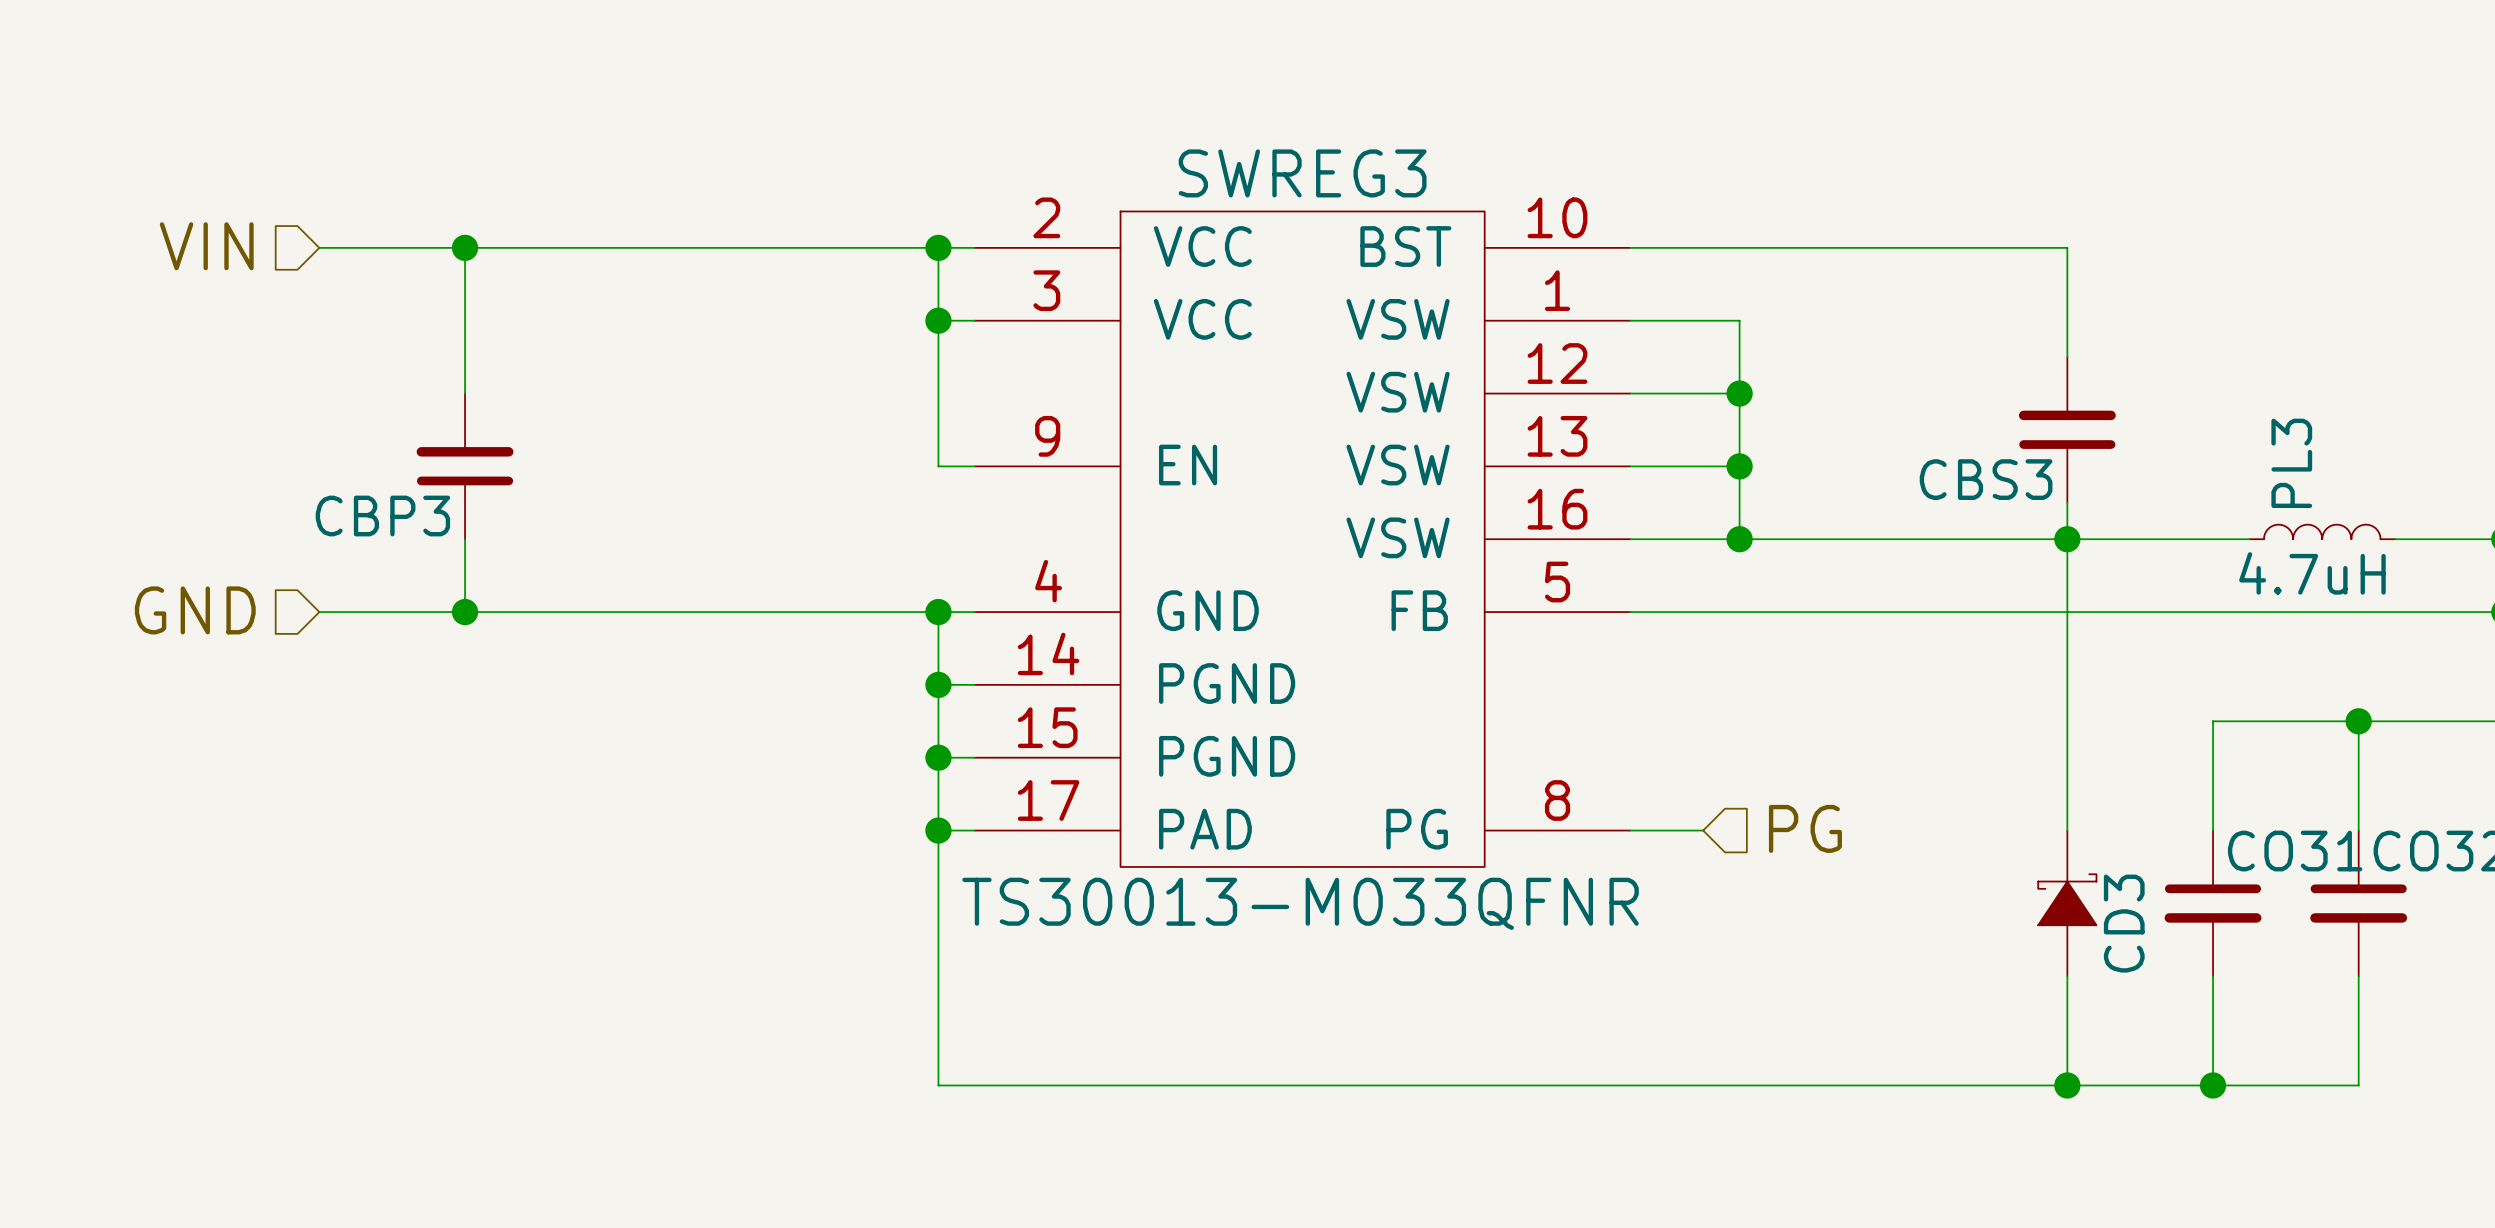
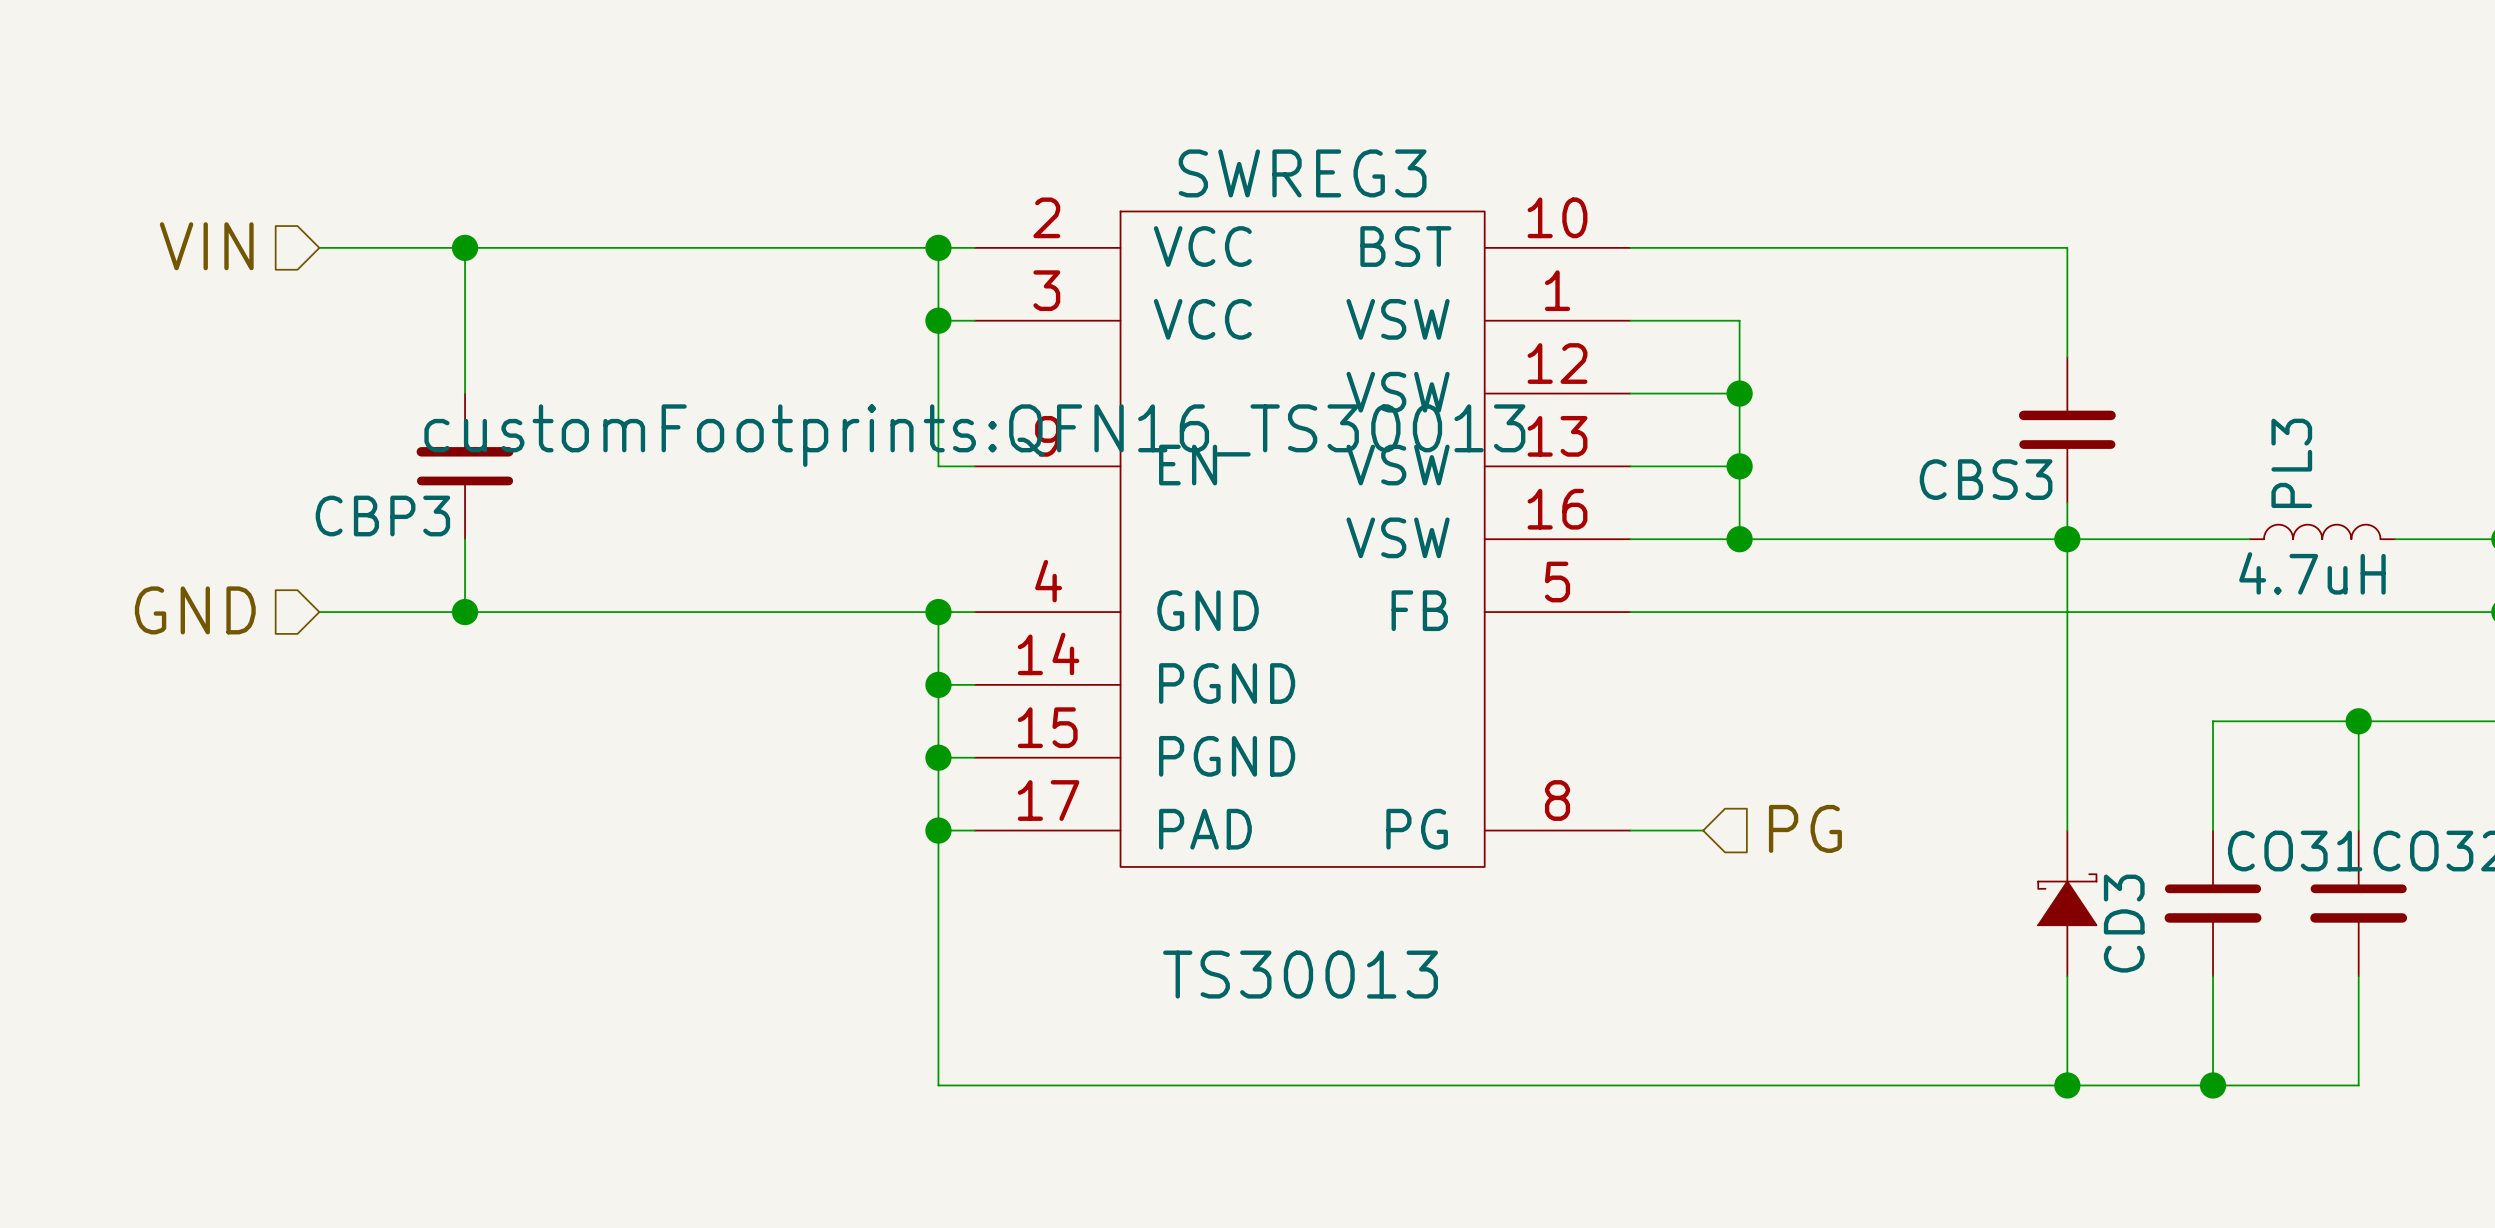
SWREG3 text: none -> customFootprints:QFN16_TS30013 (974, 435)
SWREG3 value: TS30013-M033QFNR (1300, 903) -> TS30013 (1300, 974)

